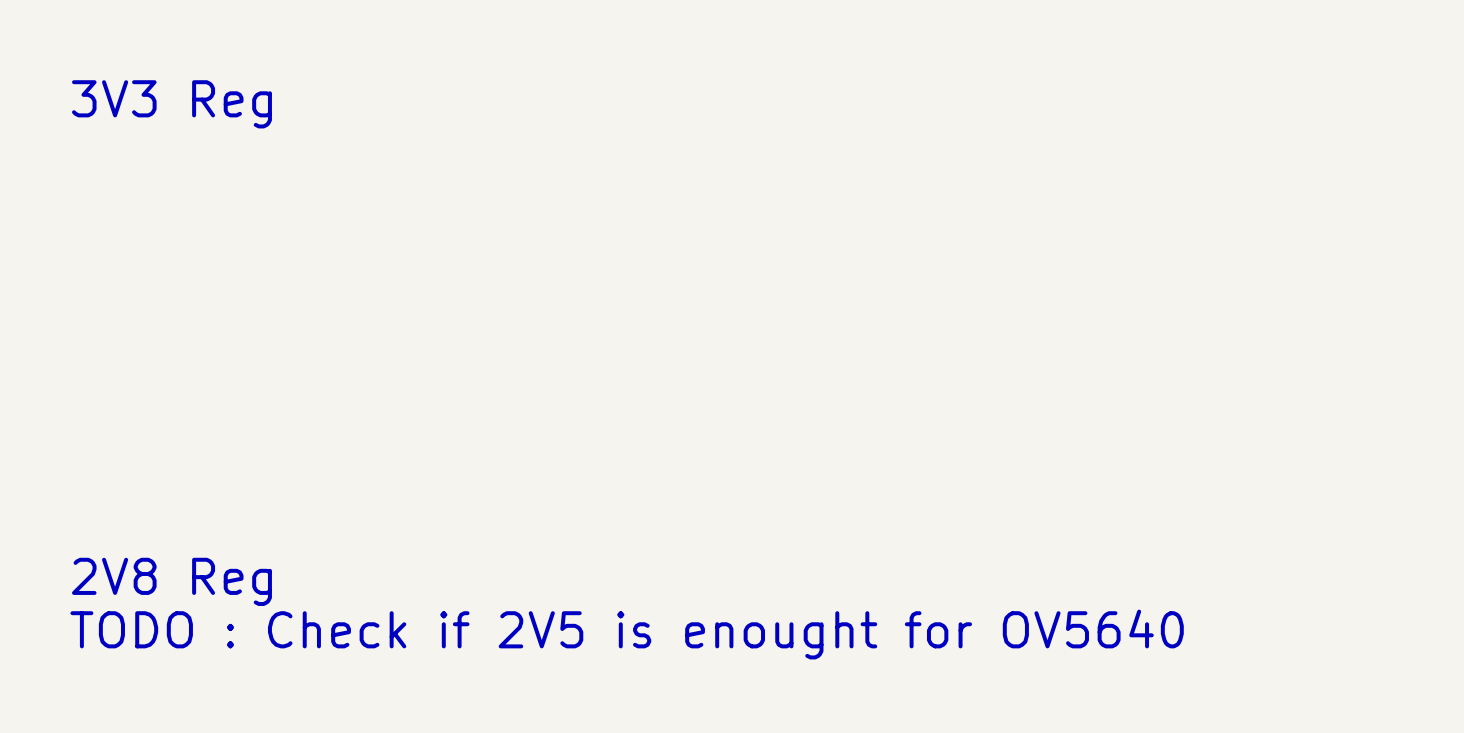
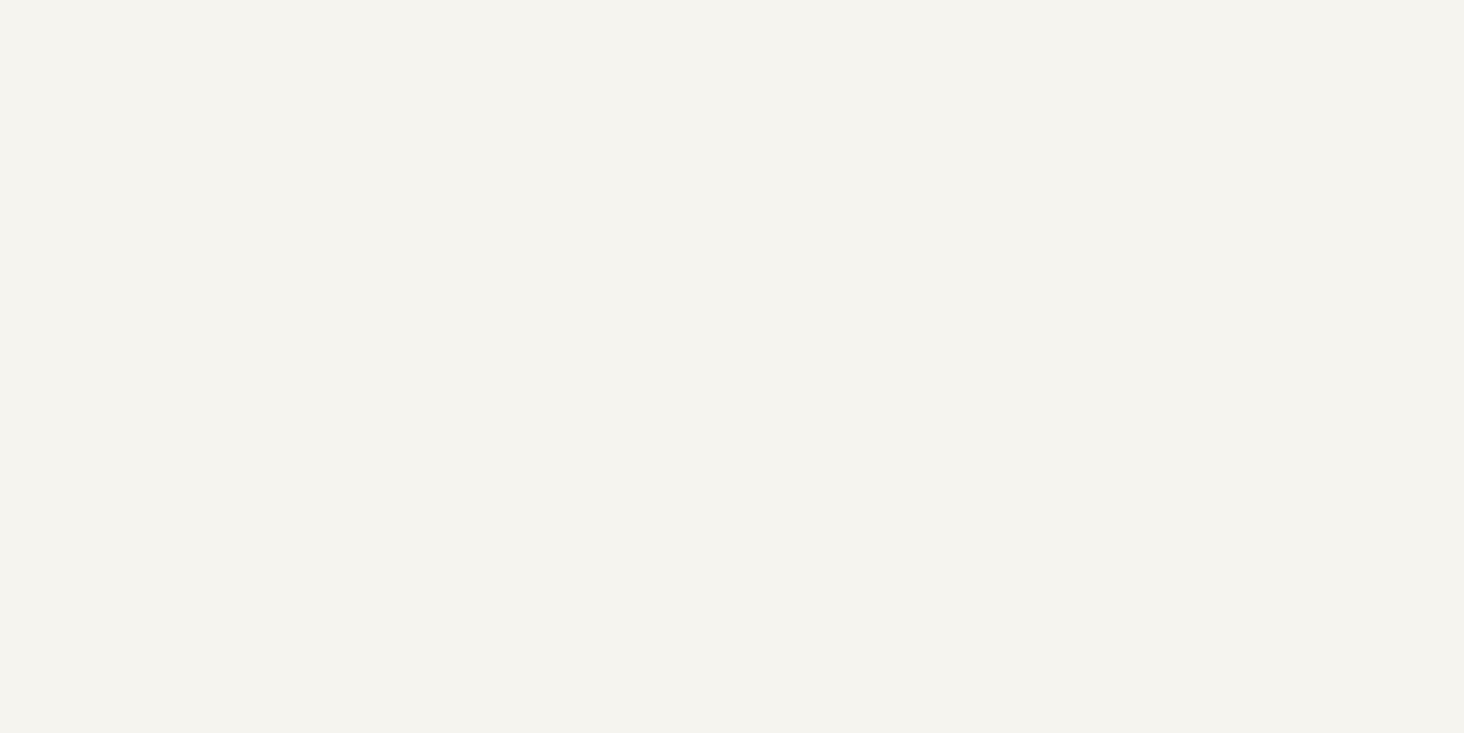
text: 3V3 Reg (171, 104) -> none
text: 2V8 Reg (171, 581) -> none
text: TODO : Check if 2V5 is enought for OV5640 (627, 634) -> none

